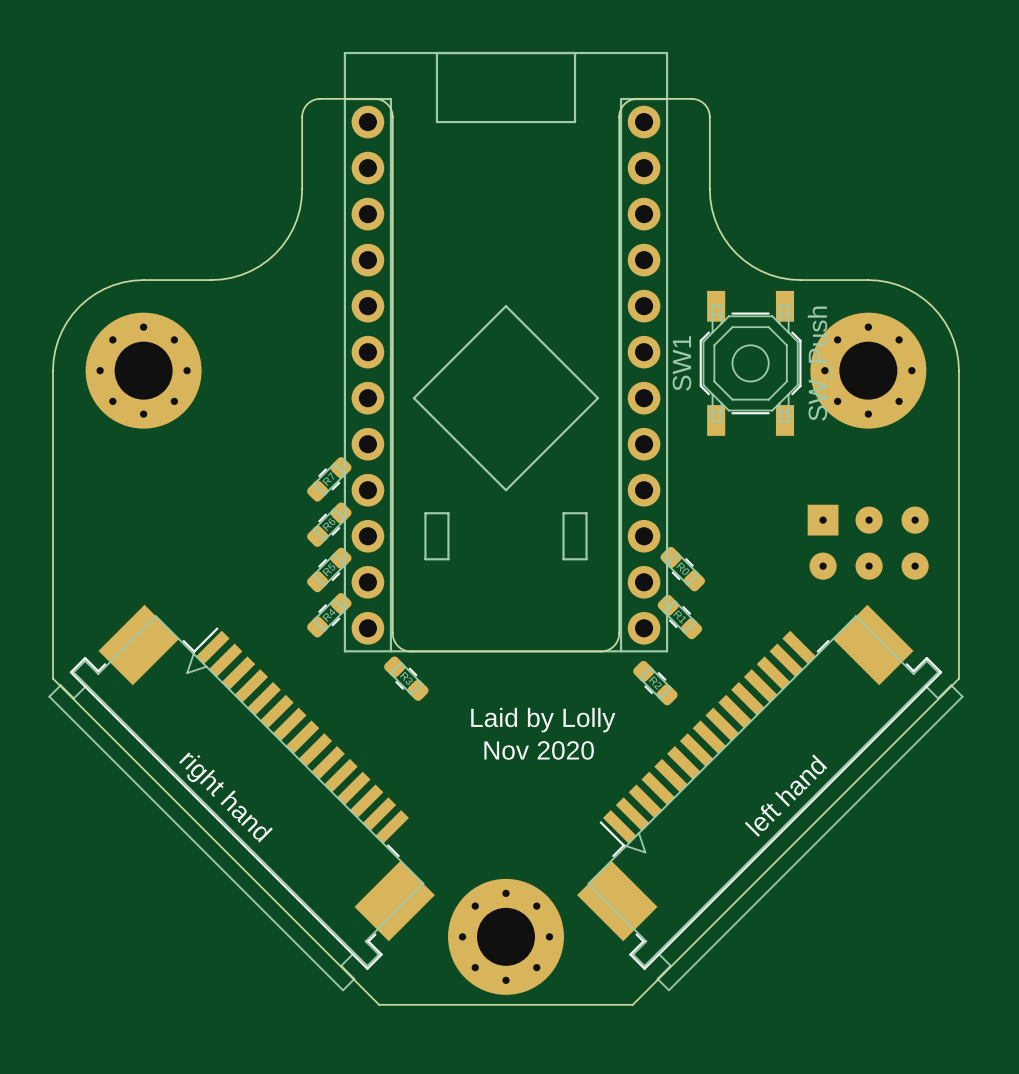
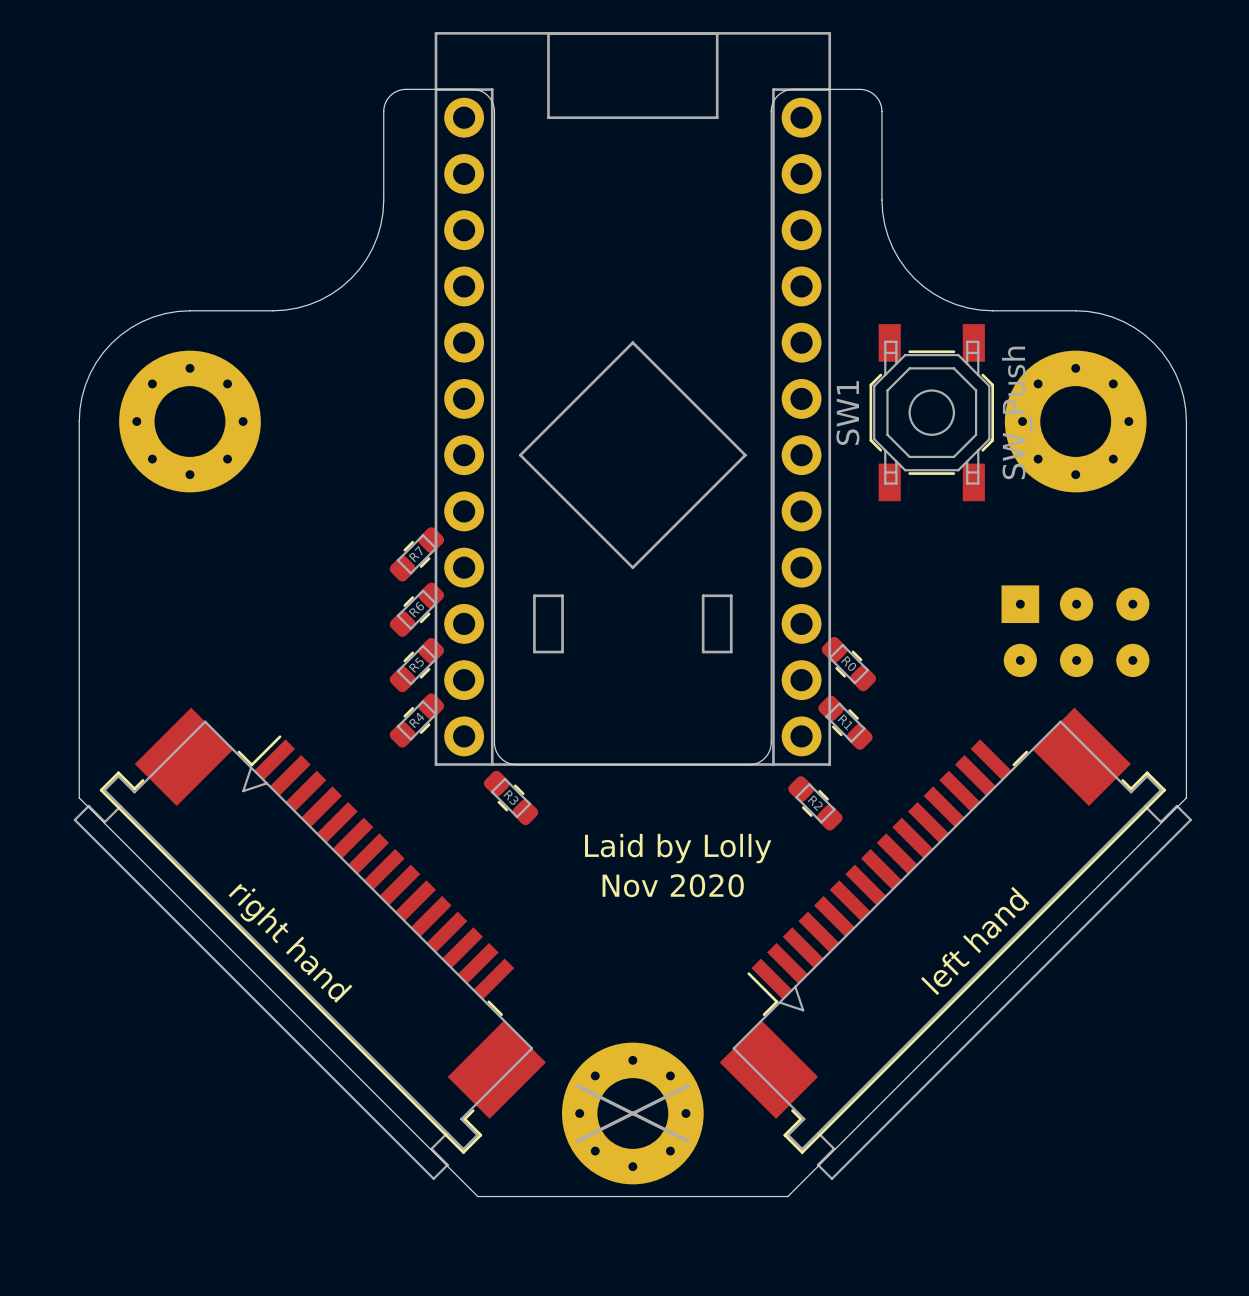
line: none -> (577, 1085) (688, 1141)
line: none -> (688, 1085) (577, 1141)

